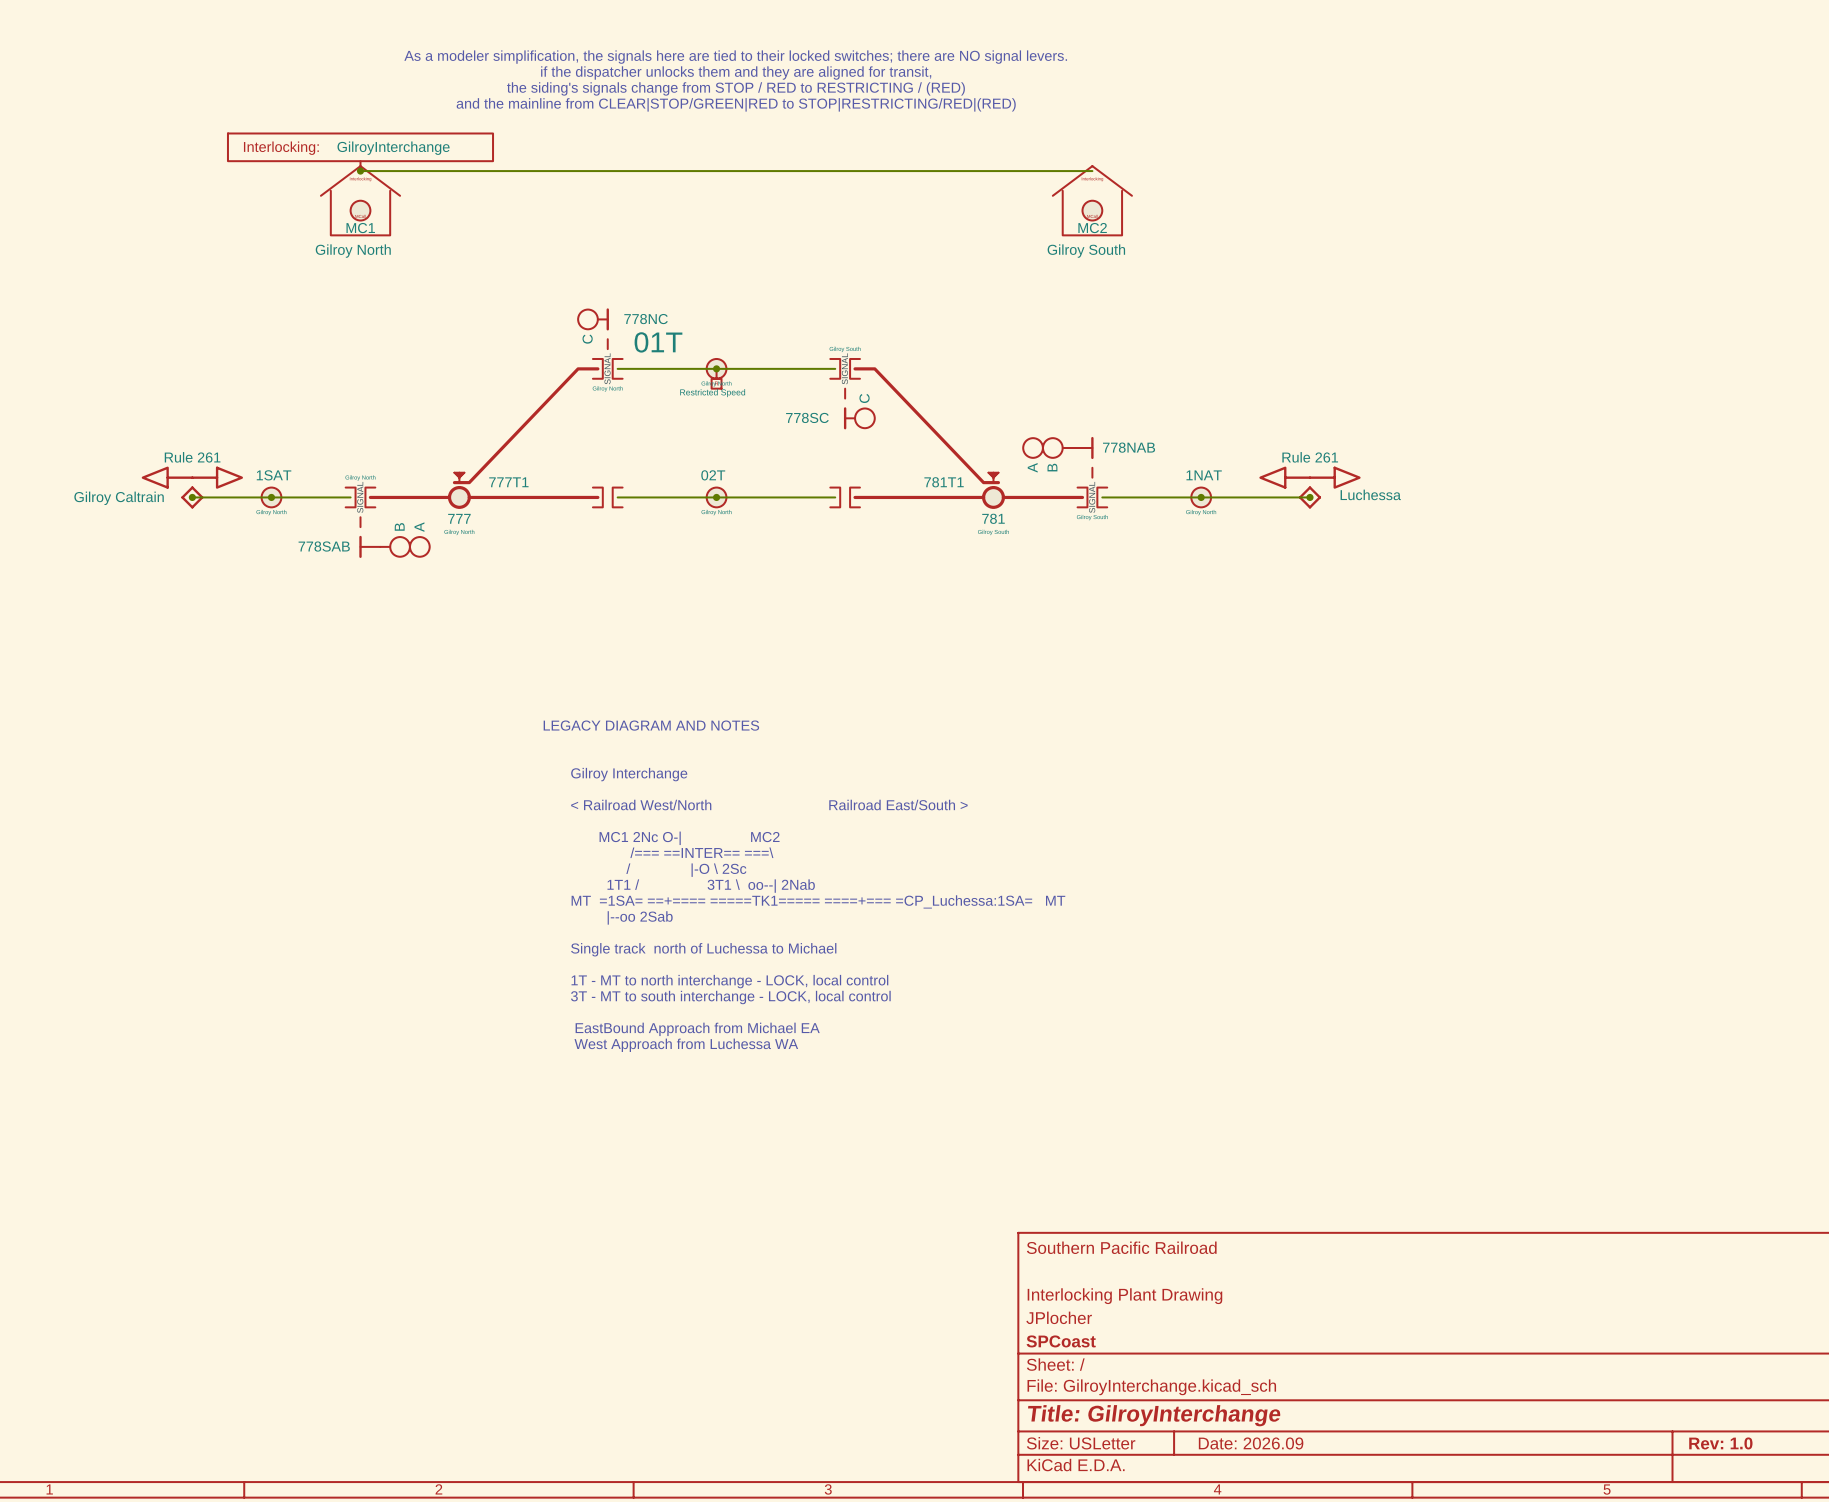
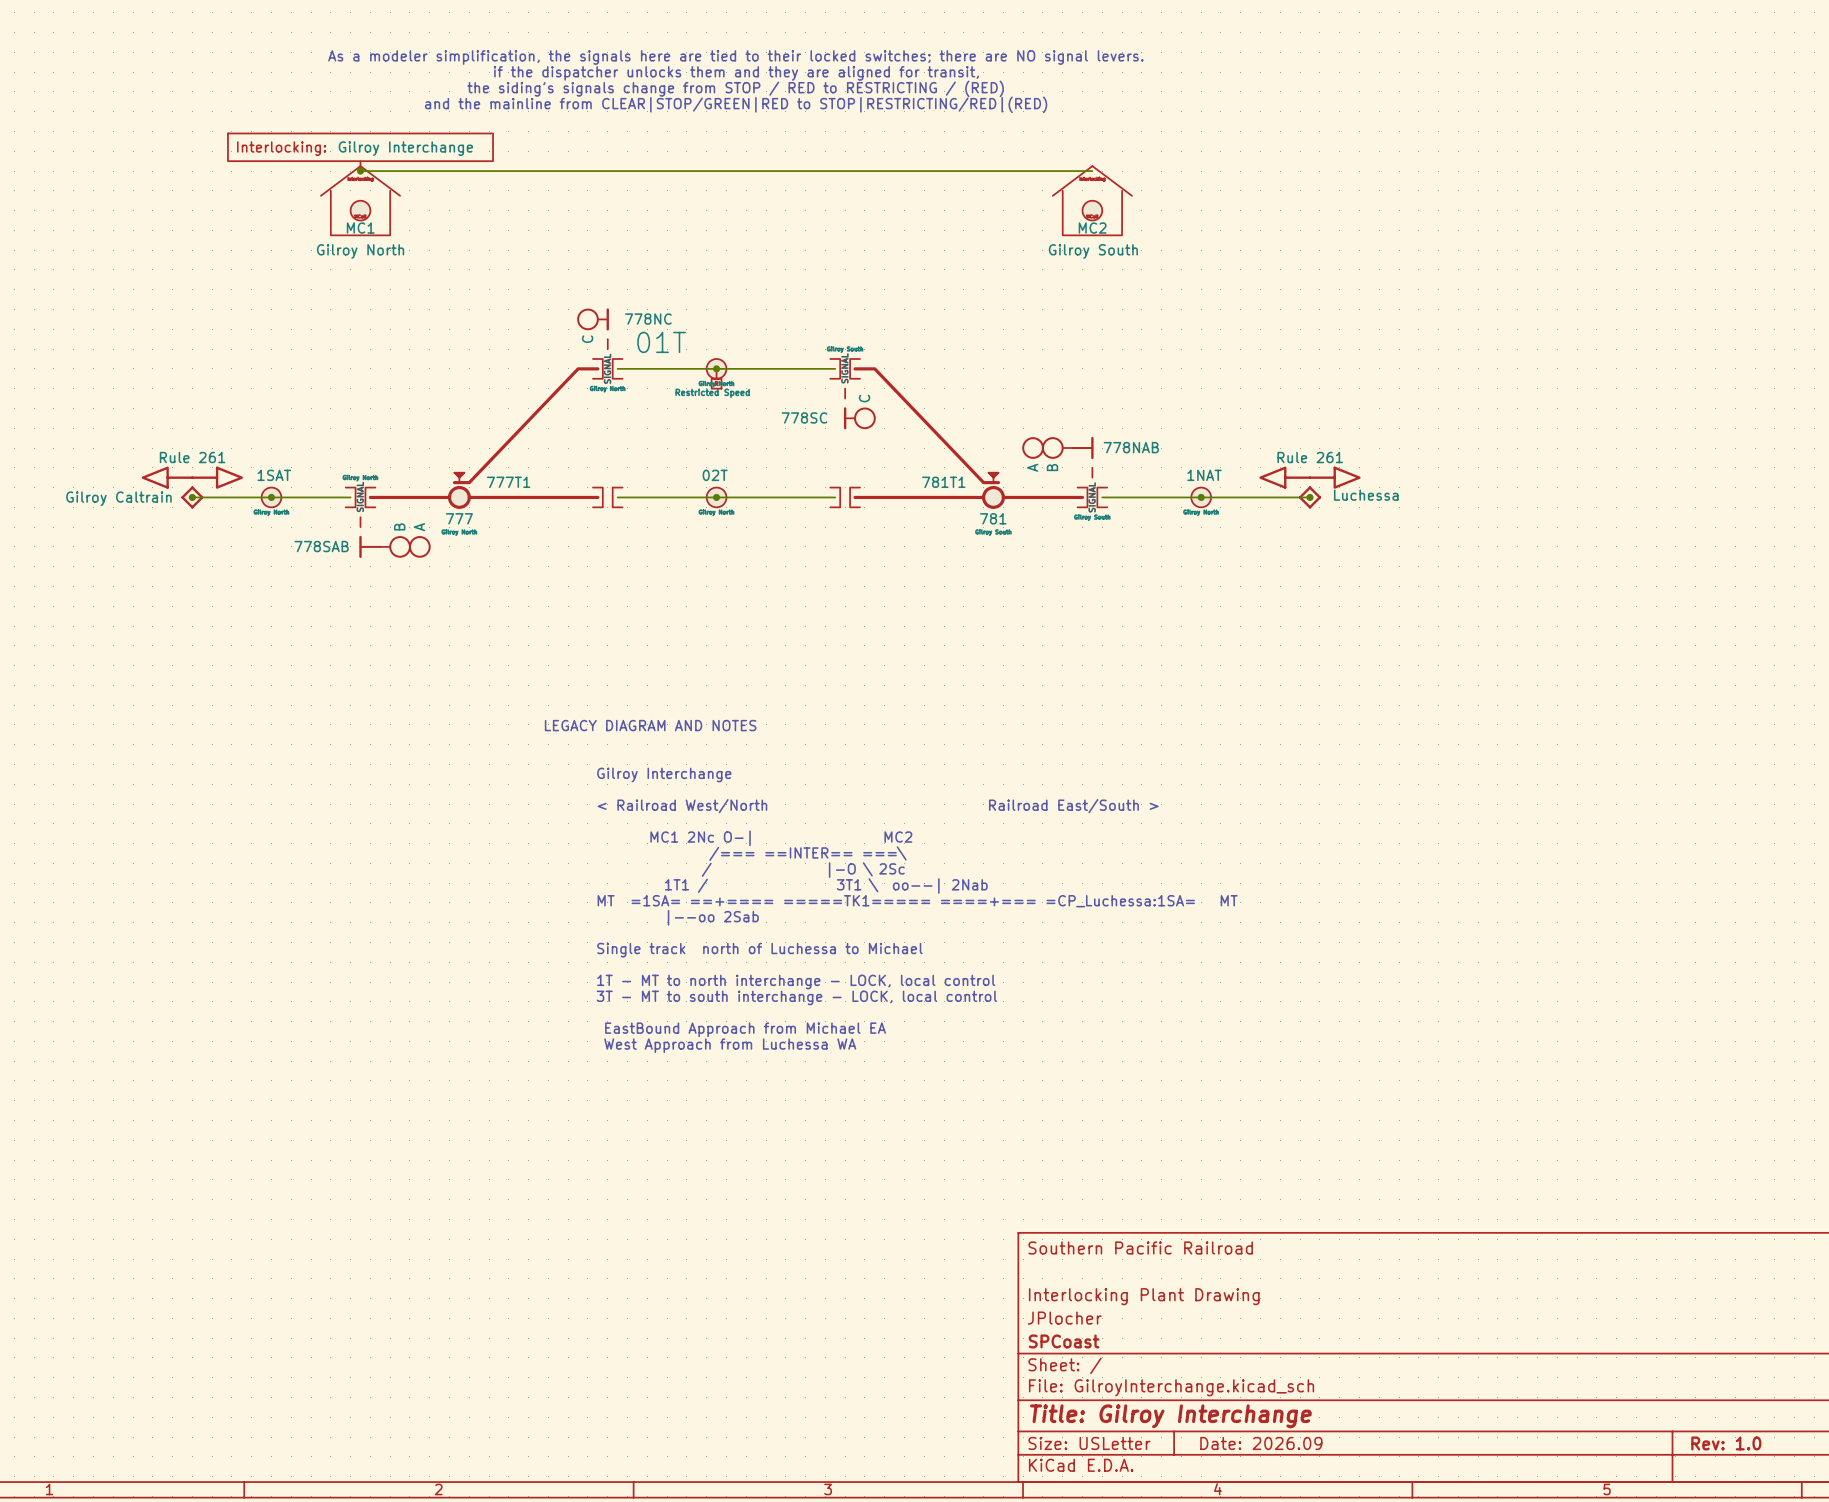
part value: GilroyInterchange (393, 148) -> Gilroy Interchange (405, 148)
title block: Title: GilroyInterchange (1154, 1415) -> Title: Gilroy Interchange (1170, 1416)

